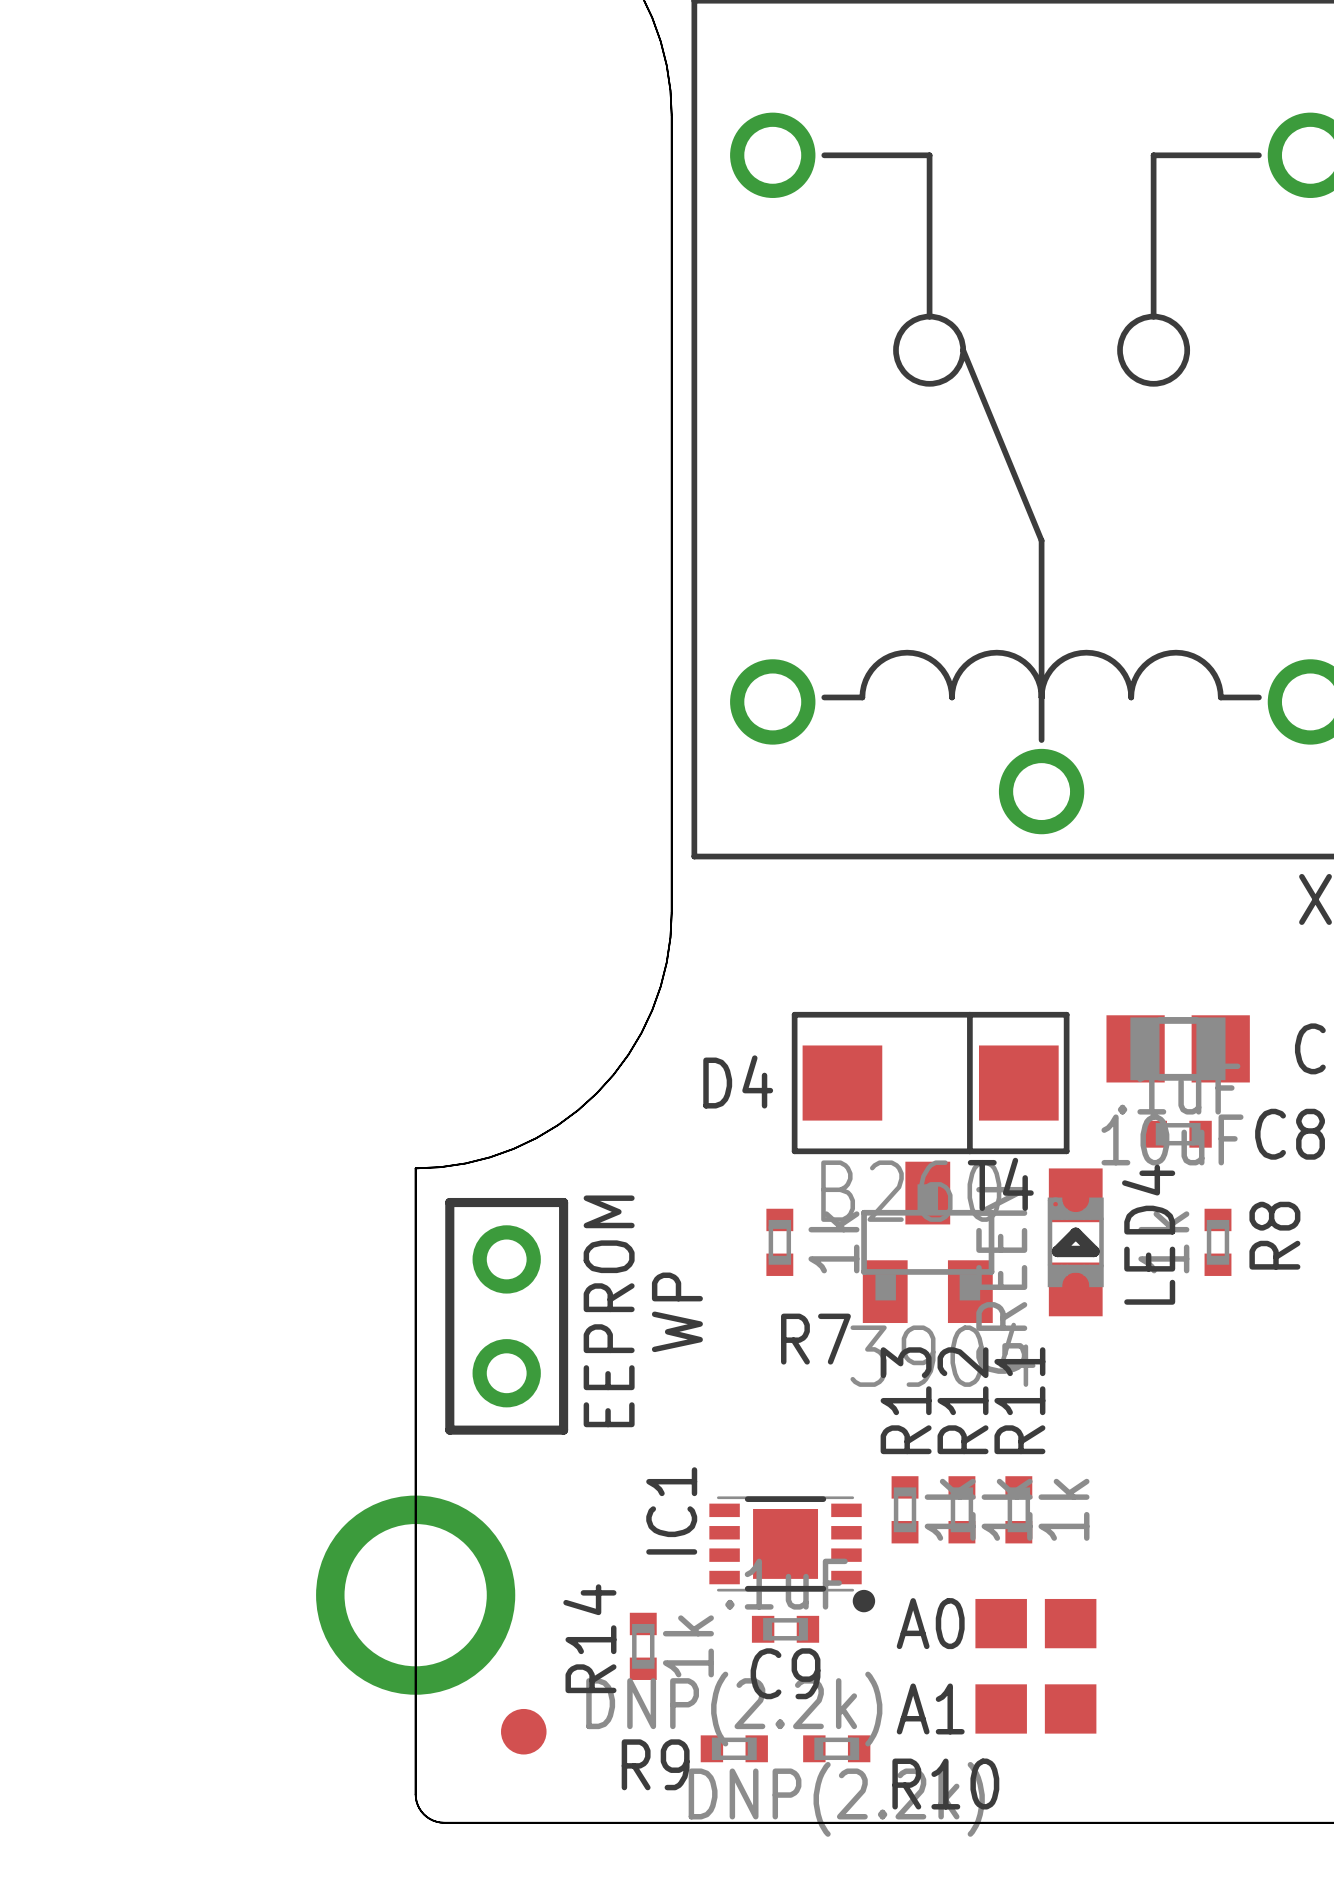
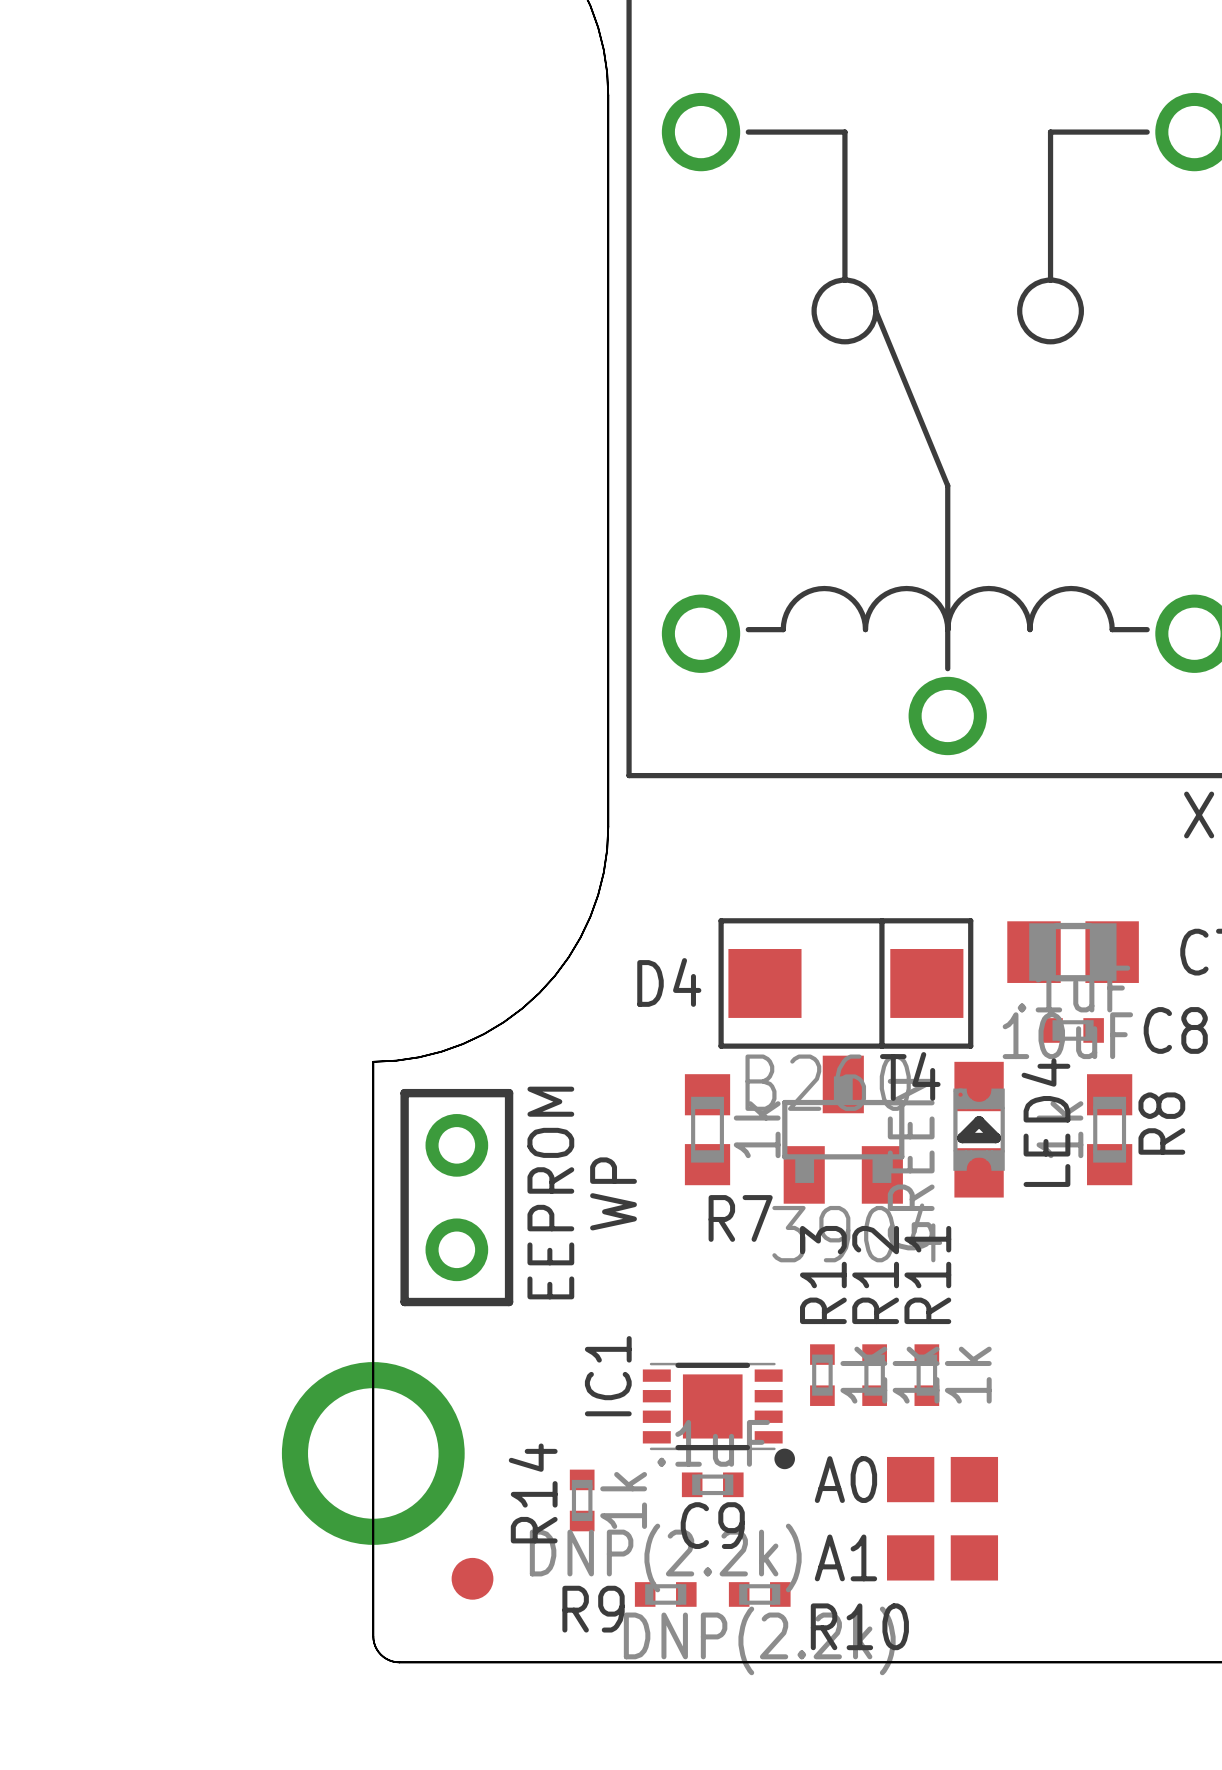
R7 footprint: [766, 1208, 794, 1276] -> [684, 1074, 731, 1186]
R8 footprint: [1204, 1208, 1232, 1276] -> [1087, 1074, 1133, 1186]

